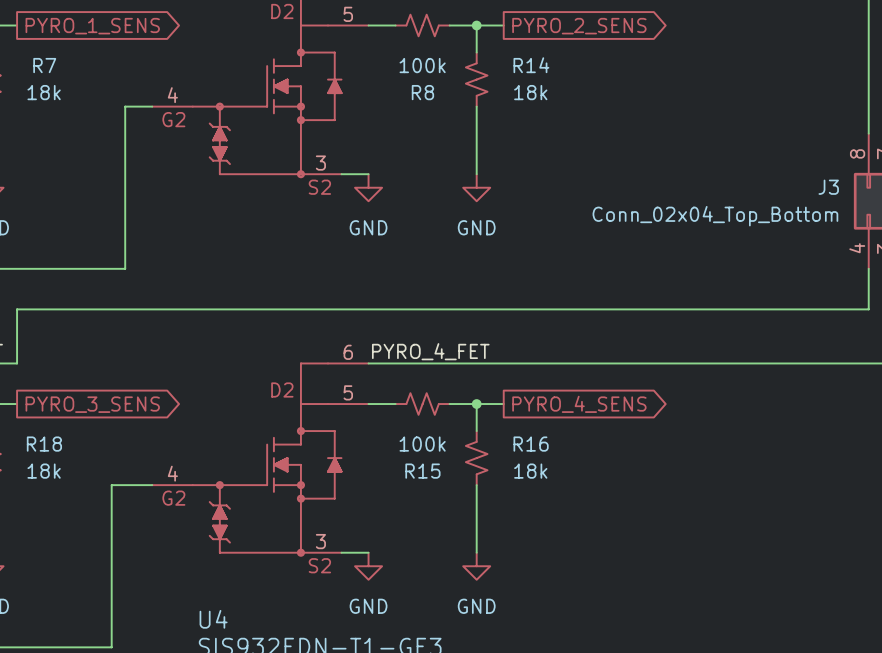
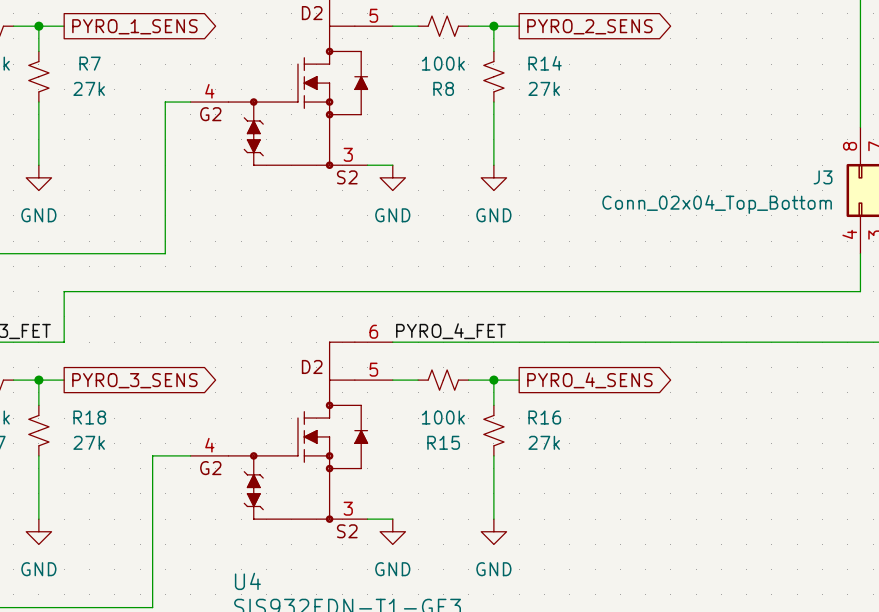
R7 value: 18k (44, 92) -> 27k (89, 88)
R14 value: 18k (530, 92) -> 27k (544, 88)
R18 value: 18k (44, 471) -> 27k (89, 442)
R16 value: 18k (530, 471) -> 27k (544, 442)

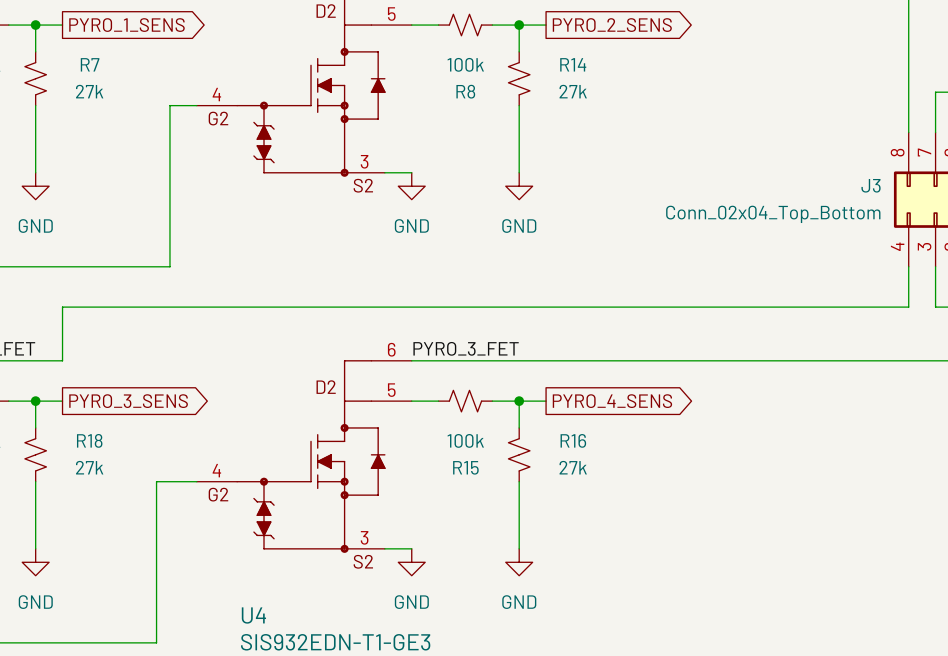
label: PYRO_4_FET (450, 331) -> PYRO_3_FET (466, 348)

